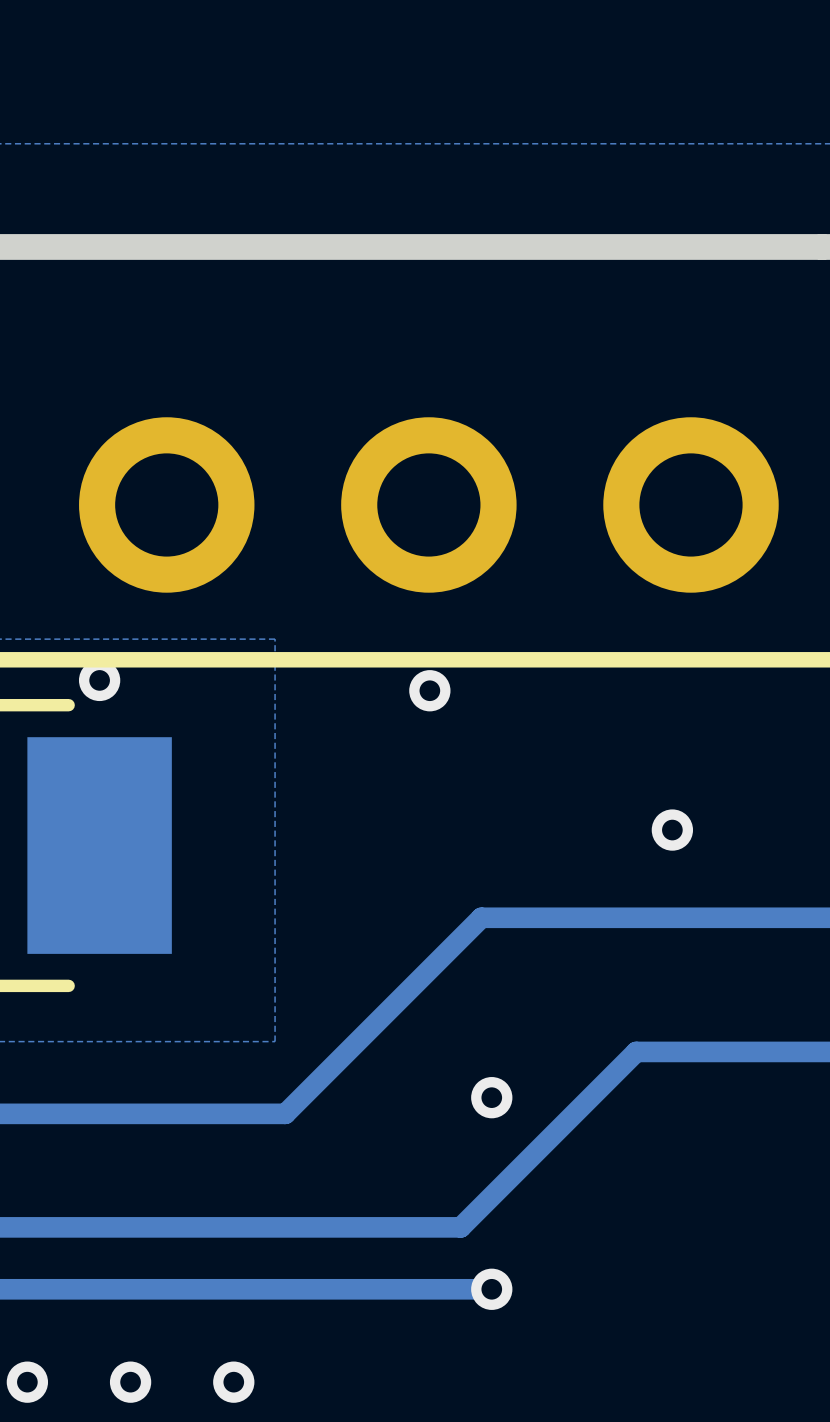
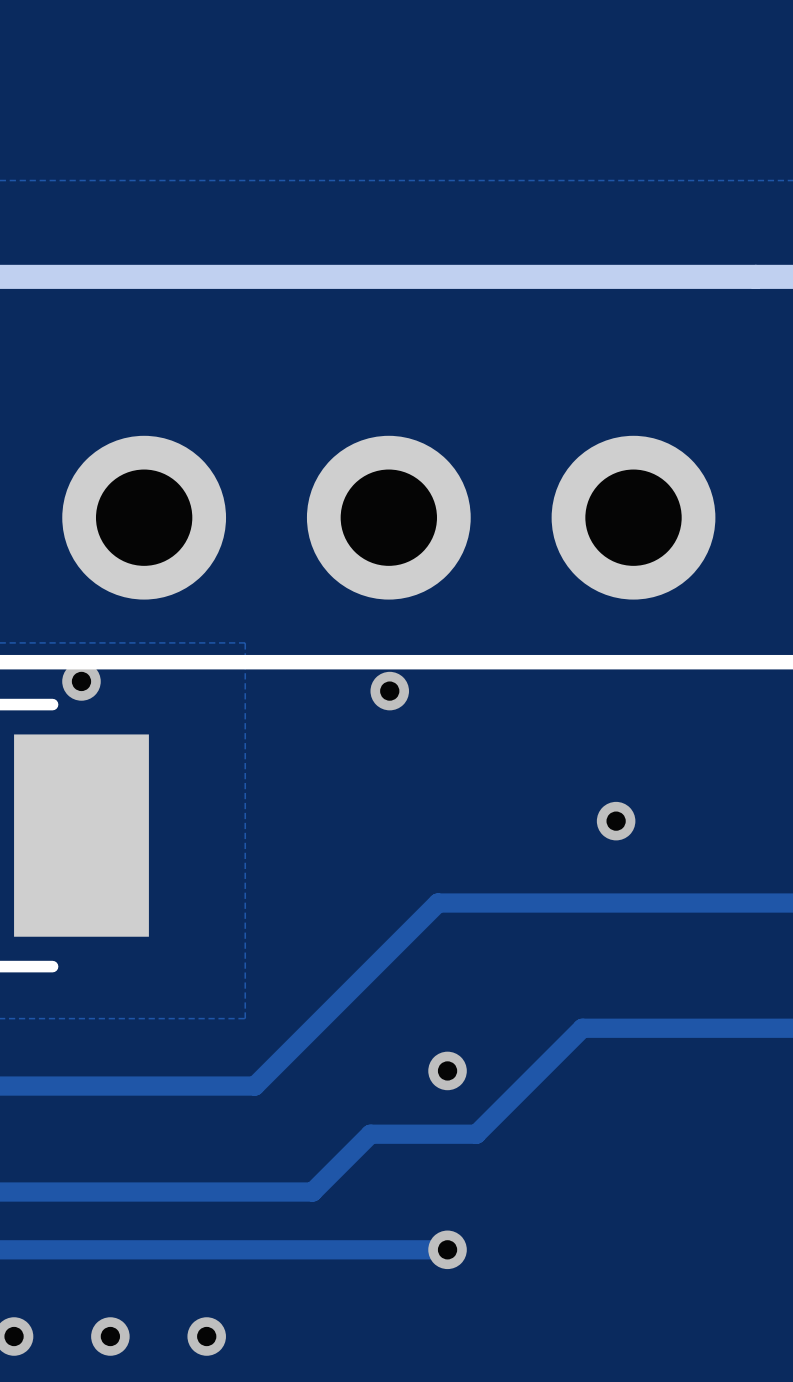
track: (522, 1165) (460, 1227) (347, 1227) -> (476, 1134) (370, 1134) (312, 1192)

